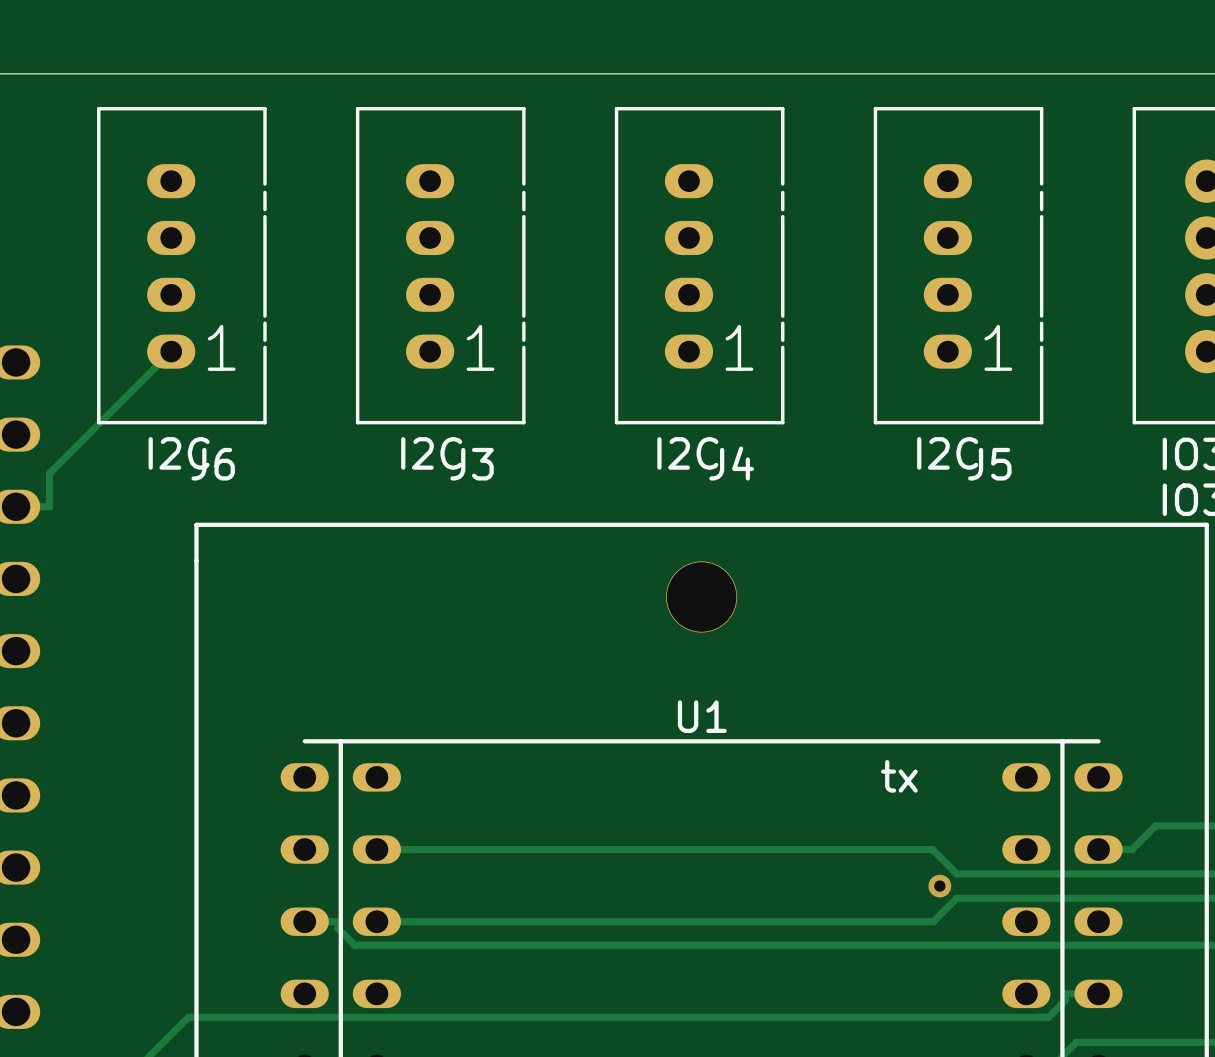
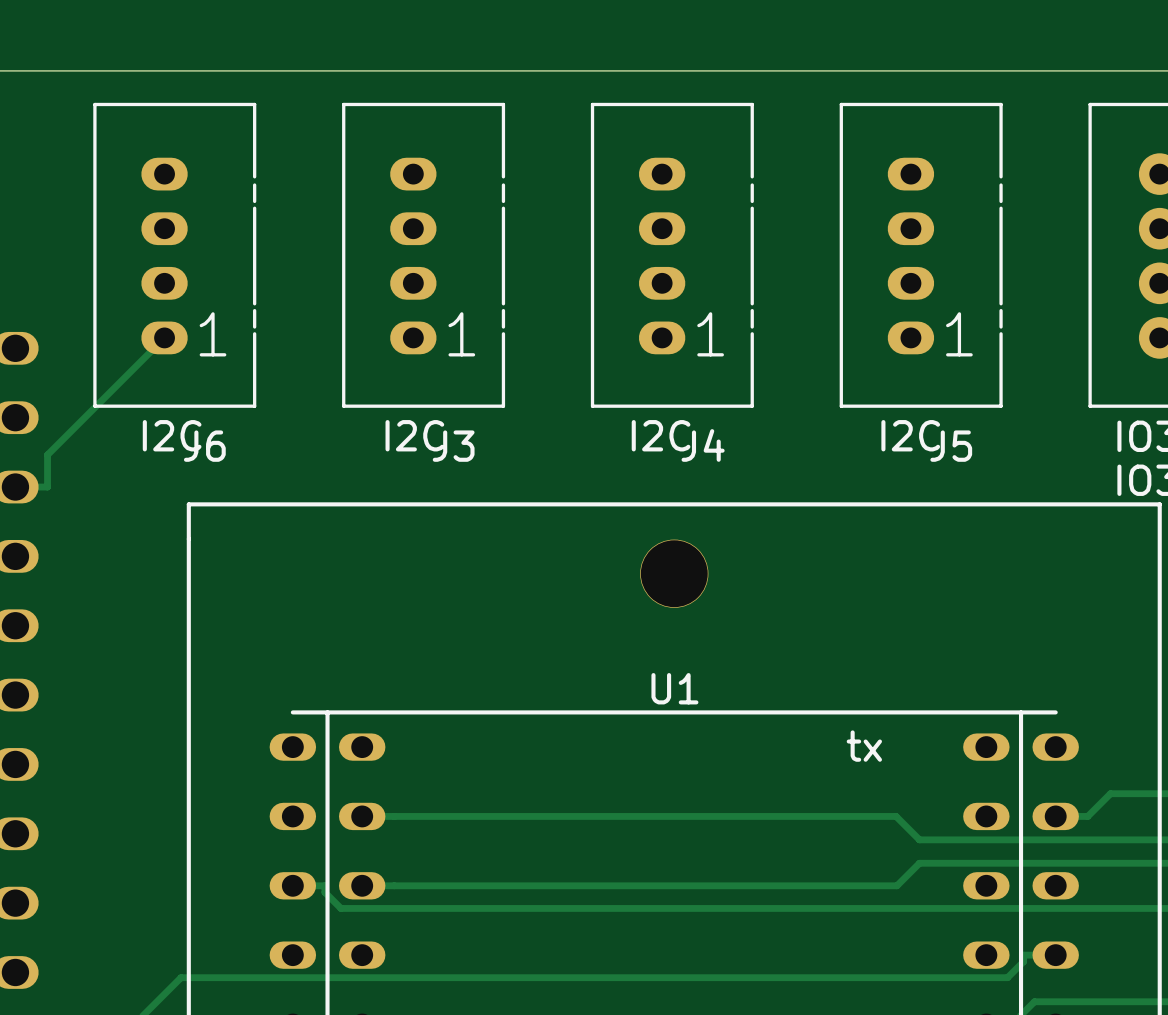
via: (939, 886) -> none

